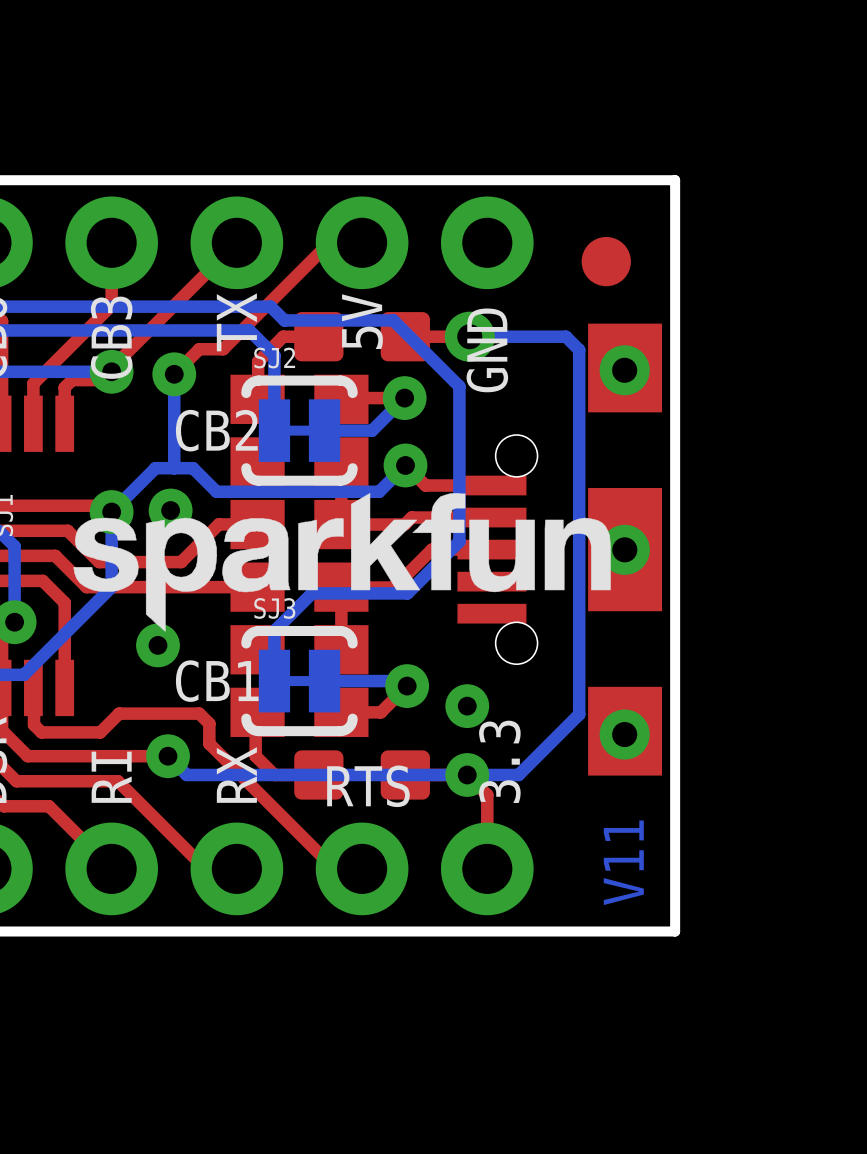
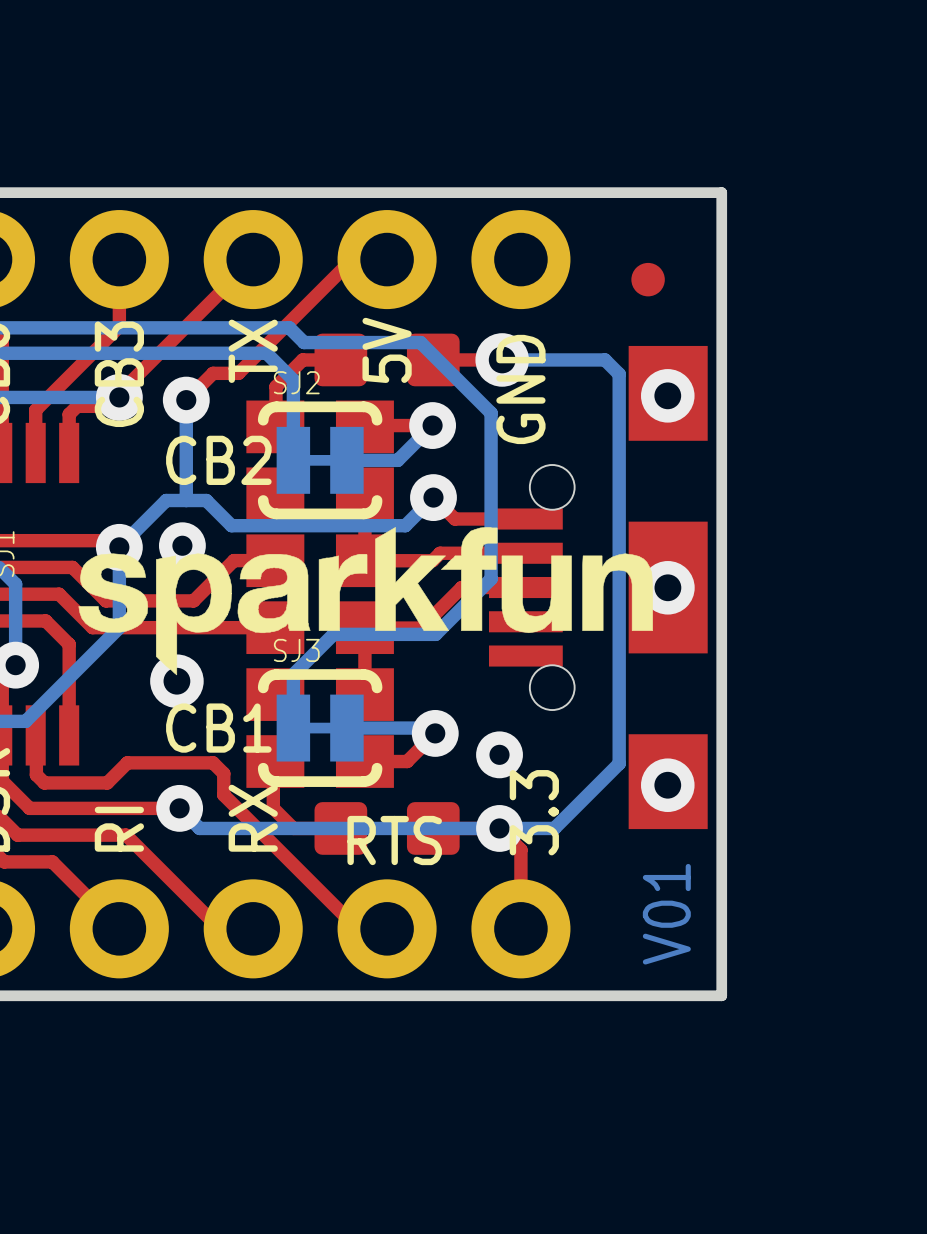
part footprint: [581, 236, 631, 287] -> [631, 262, 665, 297]
via size: [136, 623, 180, 668] -> [150, 654, 204, 708]
text: V11 (623, 862) -> V01 (666, 914)

